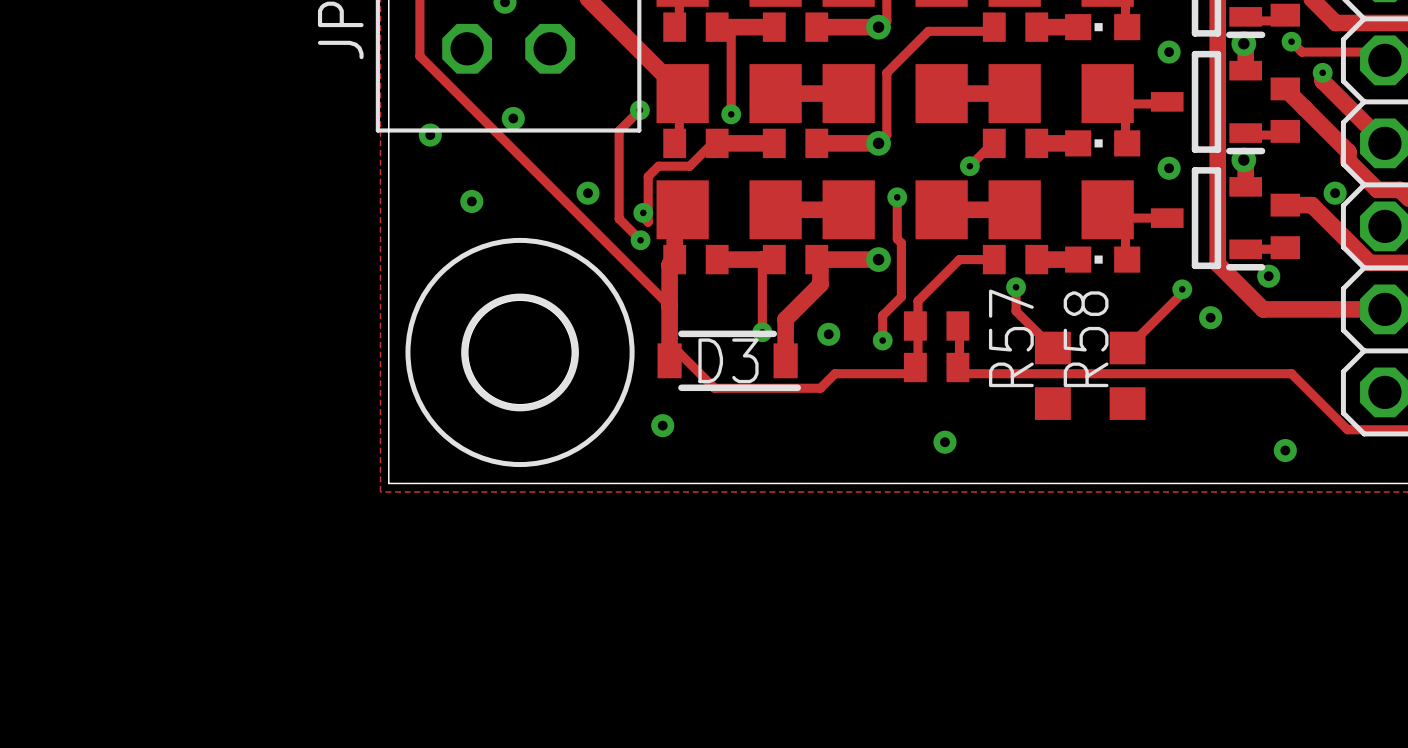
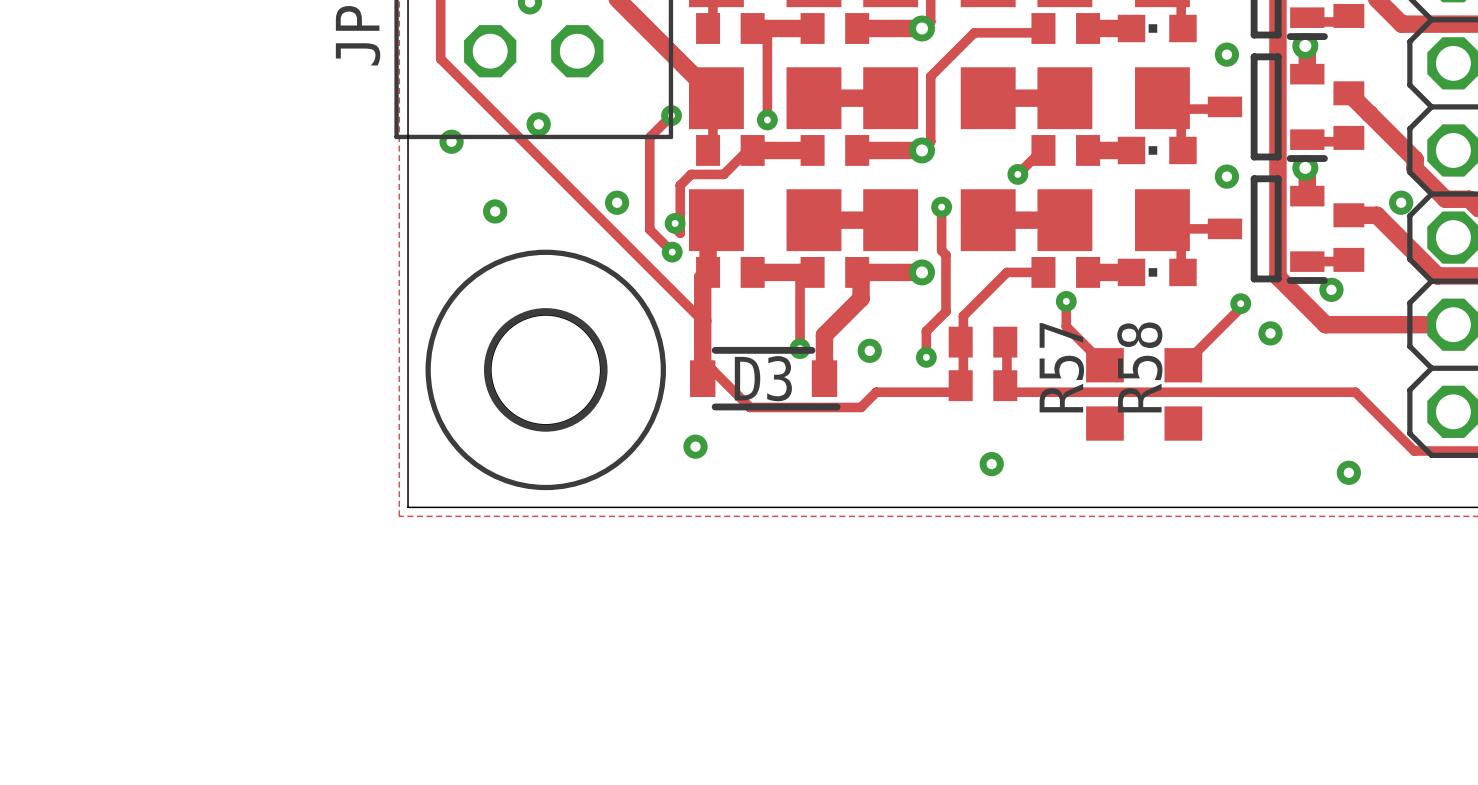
track: (1291, 41) (1301, 52) (1384, 52) (1384, 60) -> none
via: (1291, 41) -> none
track: (1322, 72) (1322, 81) (1384, 143) -> none
via: (1322, 72) -> none

